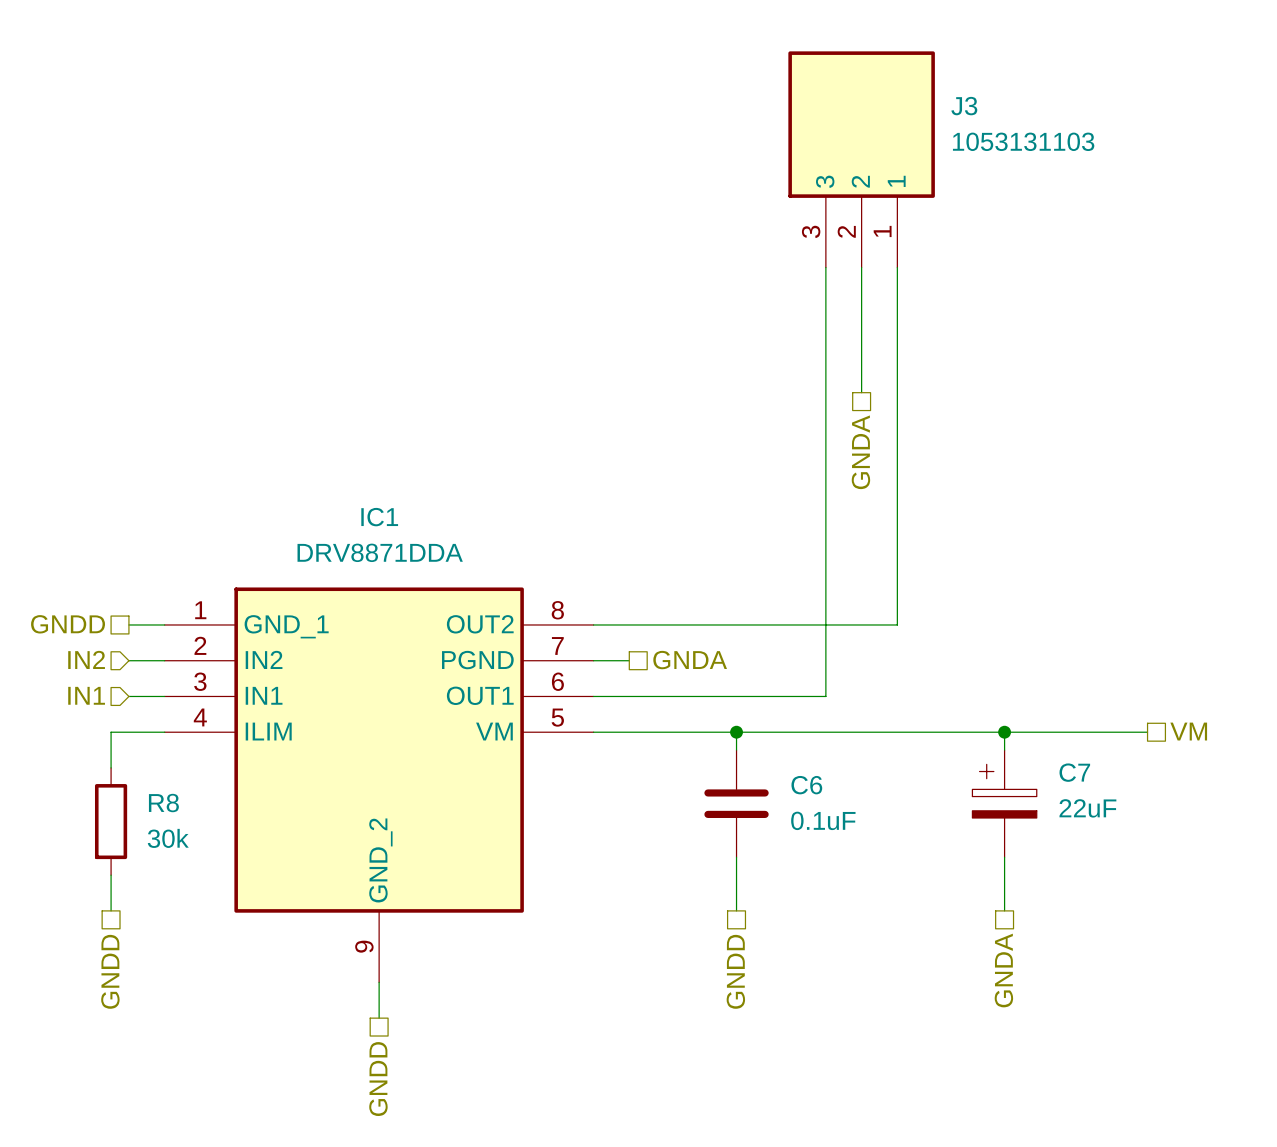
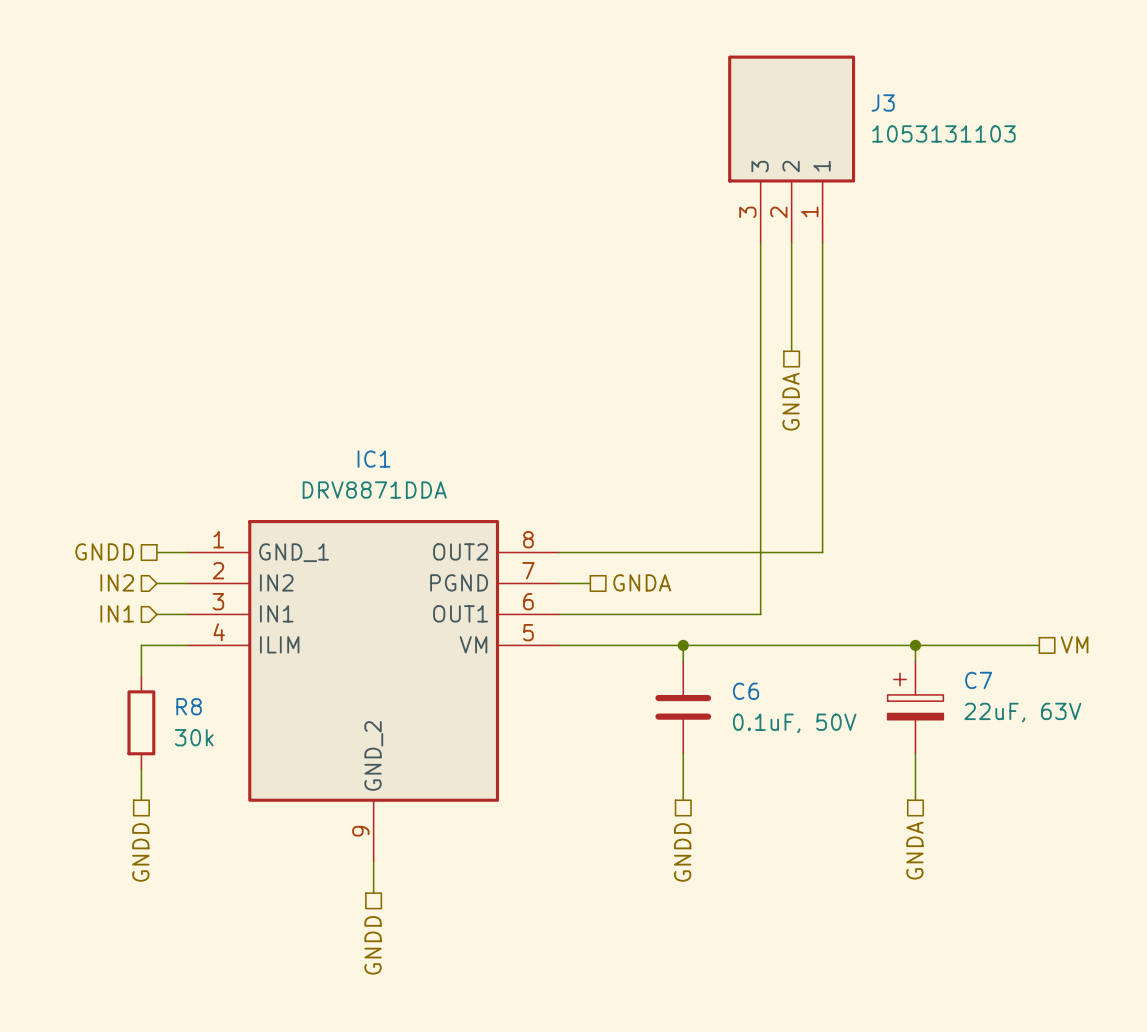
C7 value: 22uF (1087, 808) -> 22uF, 63V (1022, 712)
C6 value: 0.1uF (823, 820) -> 0.1uF, 50V (794, 723)

